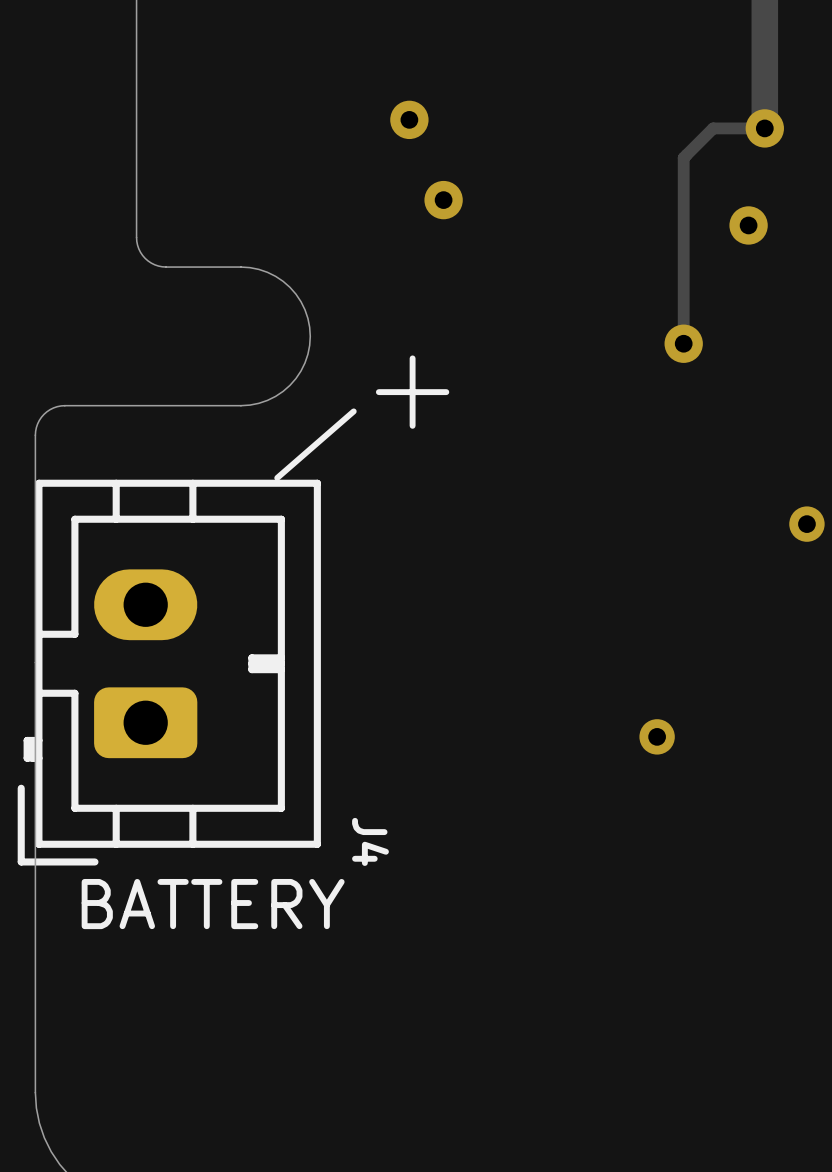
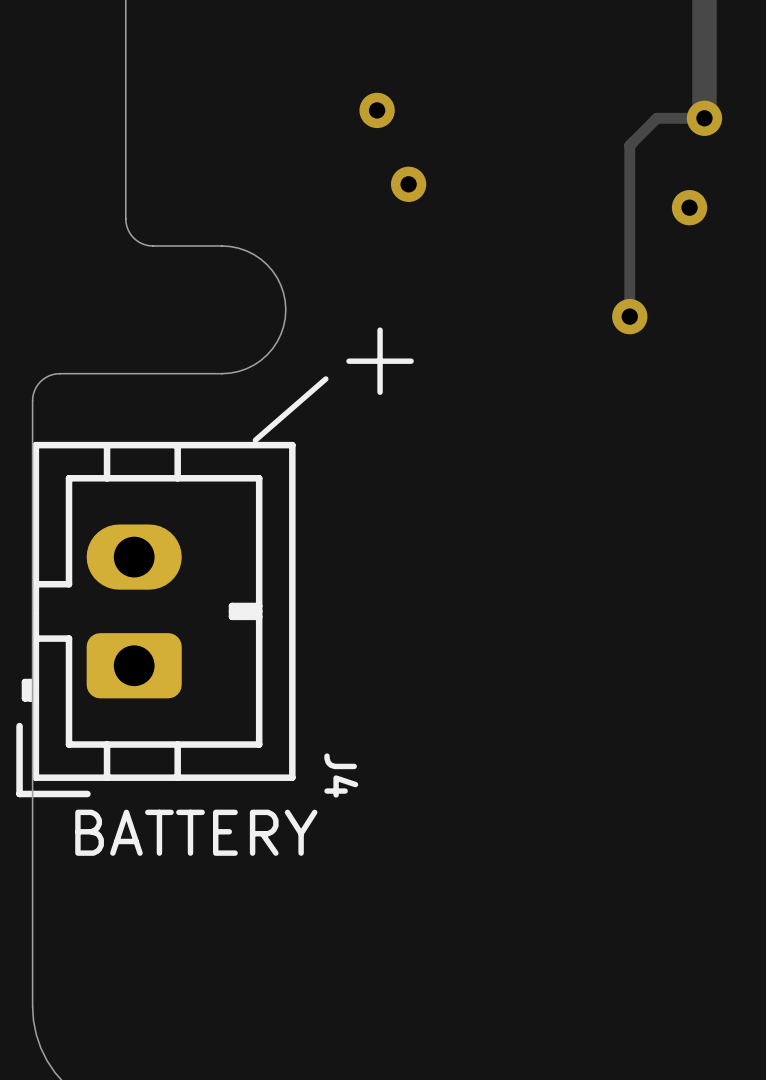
via: (806, 524) -> none
via: (657, 736) -> none

